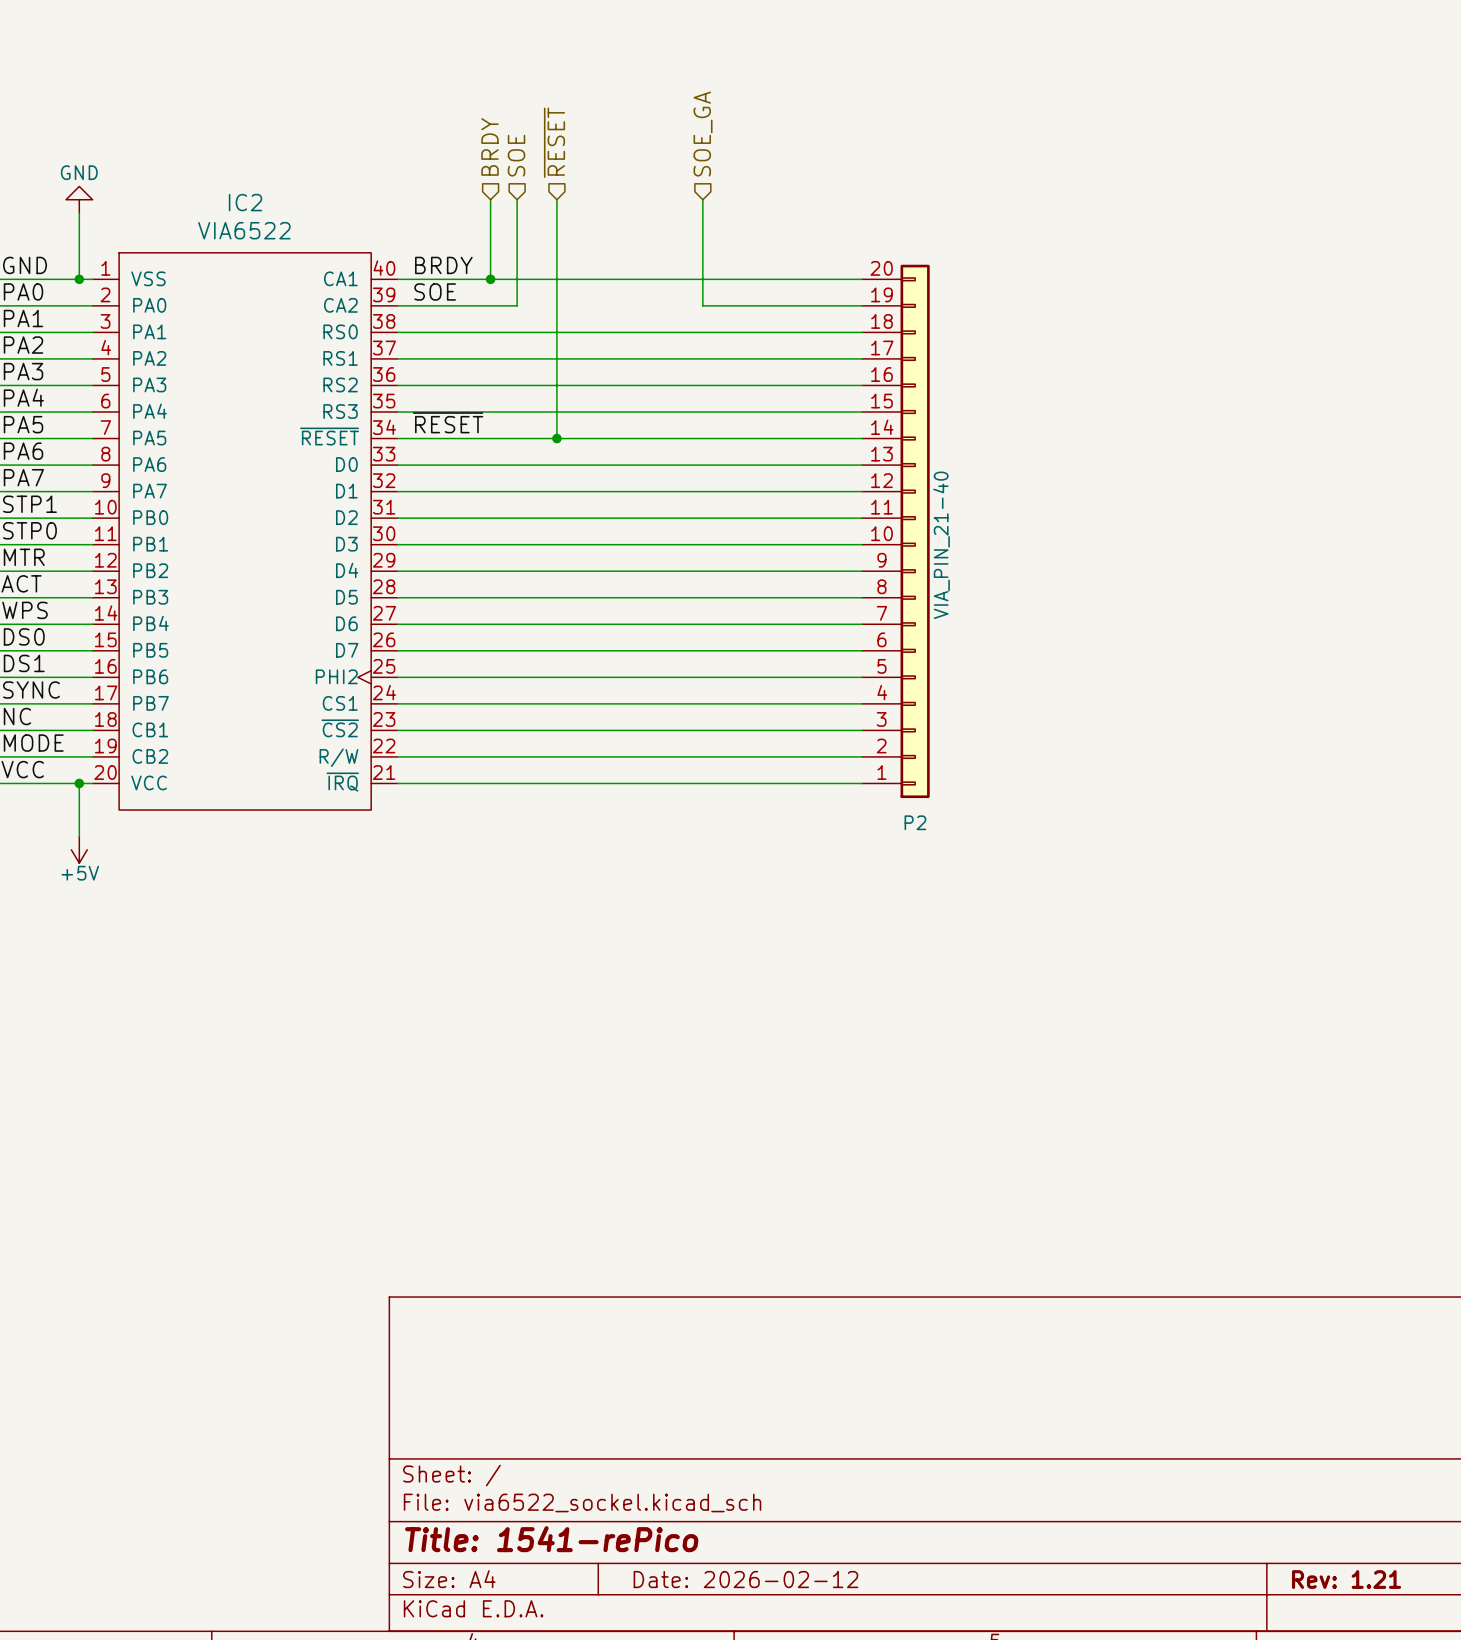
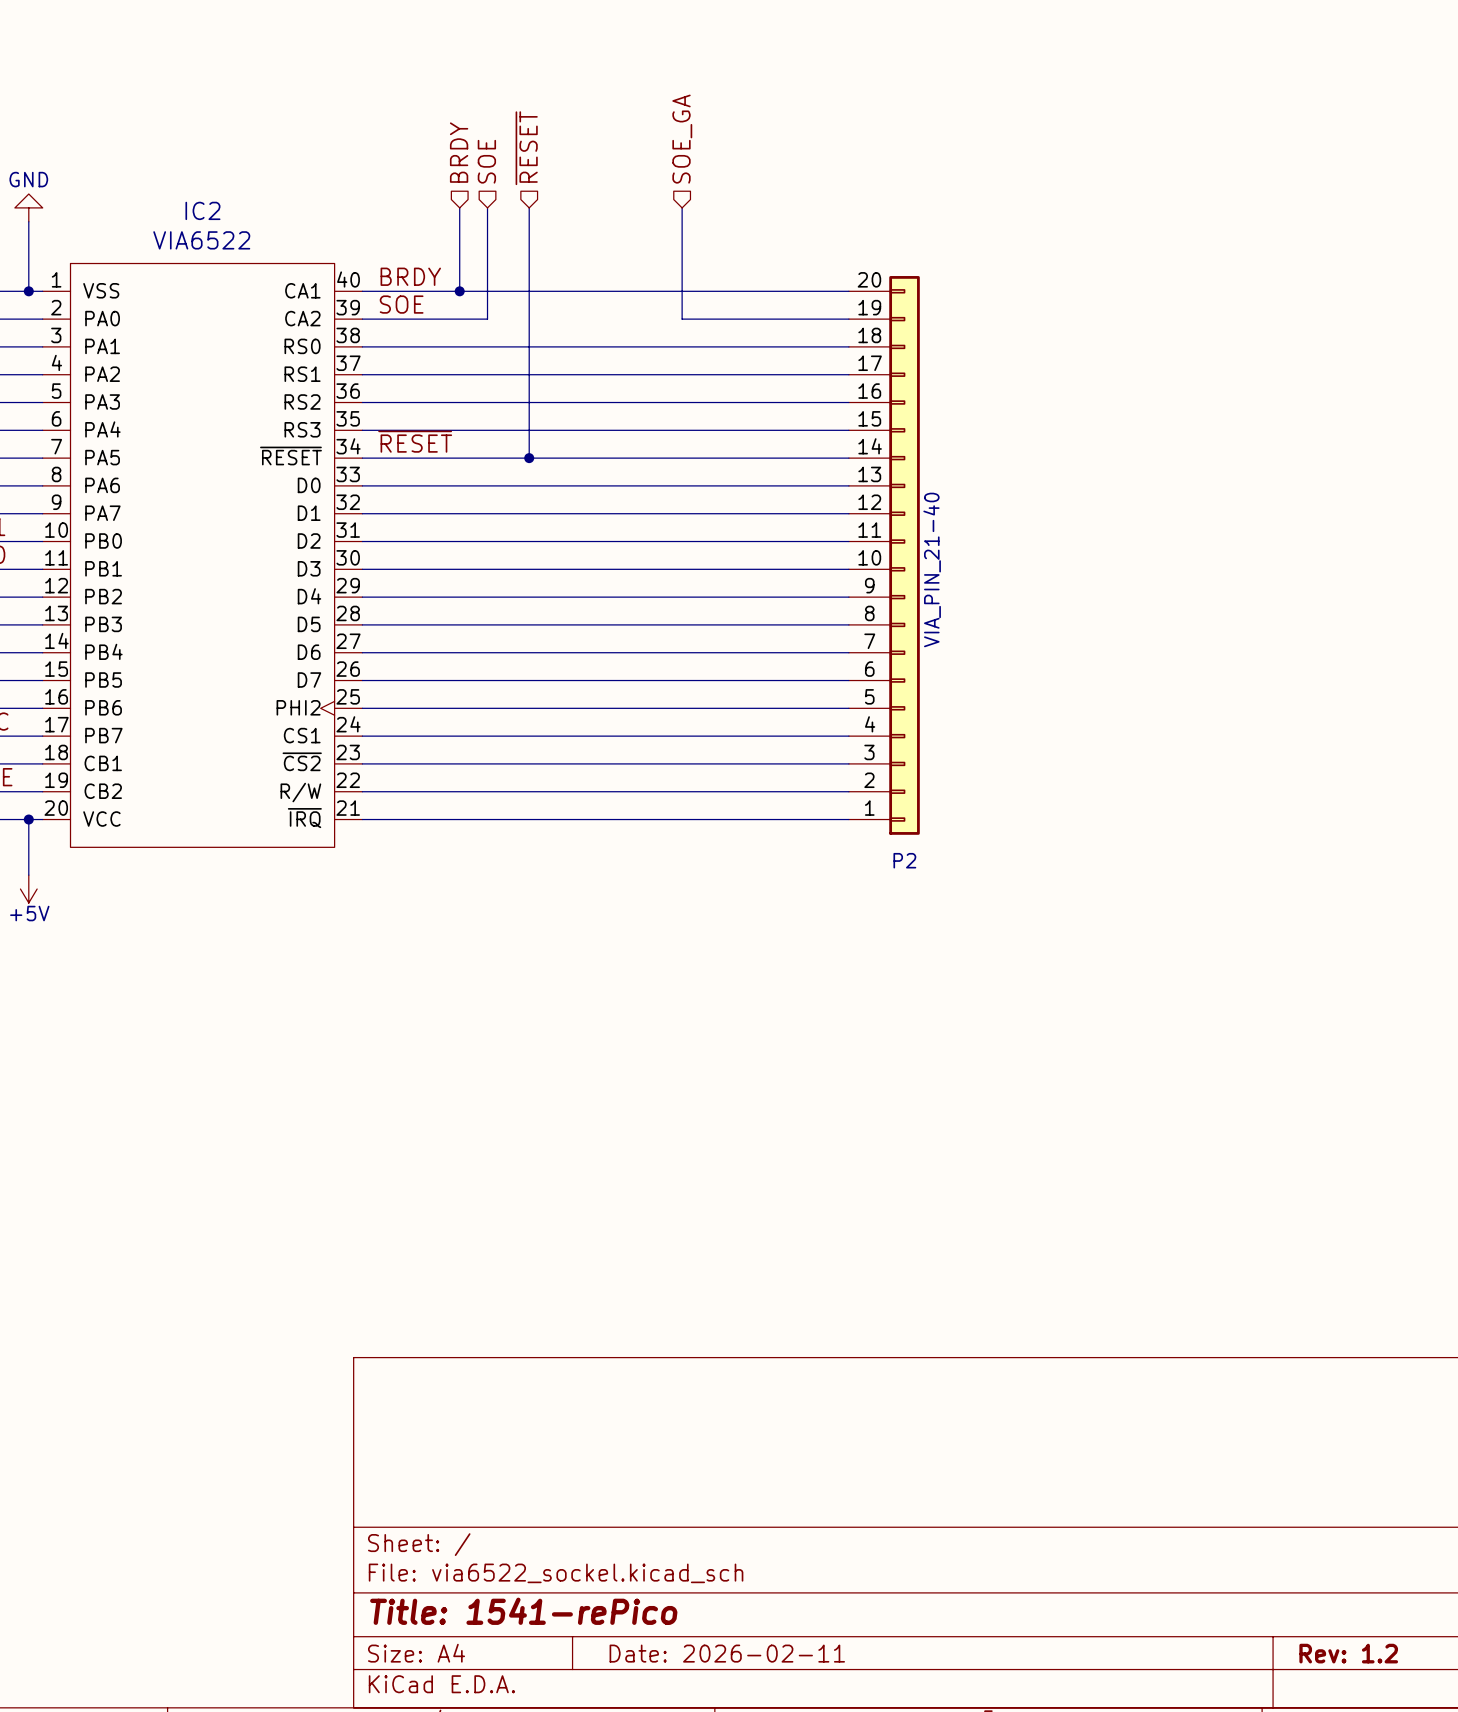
title block: Date: 2026-02-12 (745, 1579) -> Date: 2026-02-11 (727, 1653)
title block: Rev: 1.21 (1346, 1579) -> Rev: 1.2 (1348, 1653)

